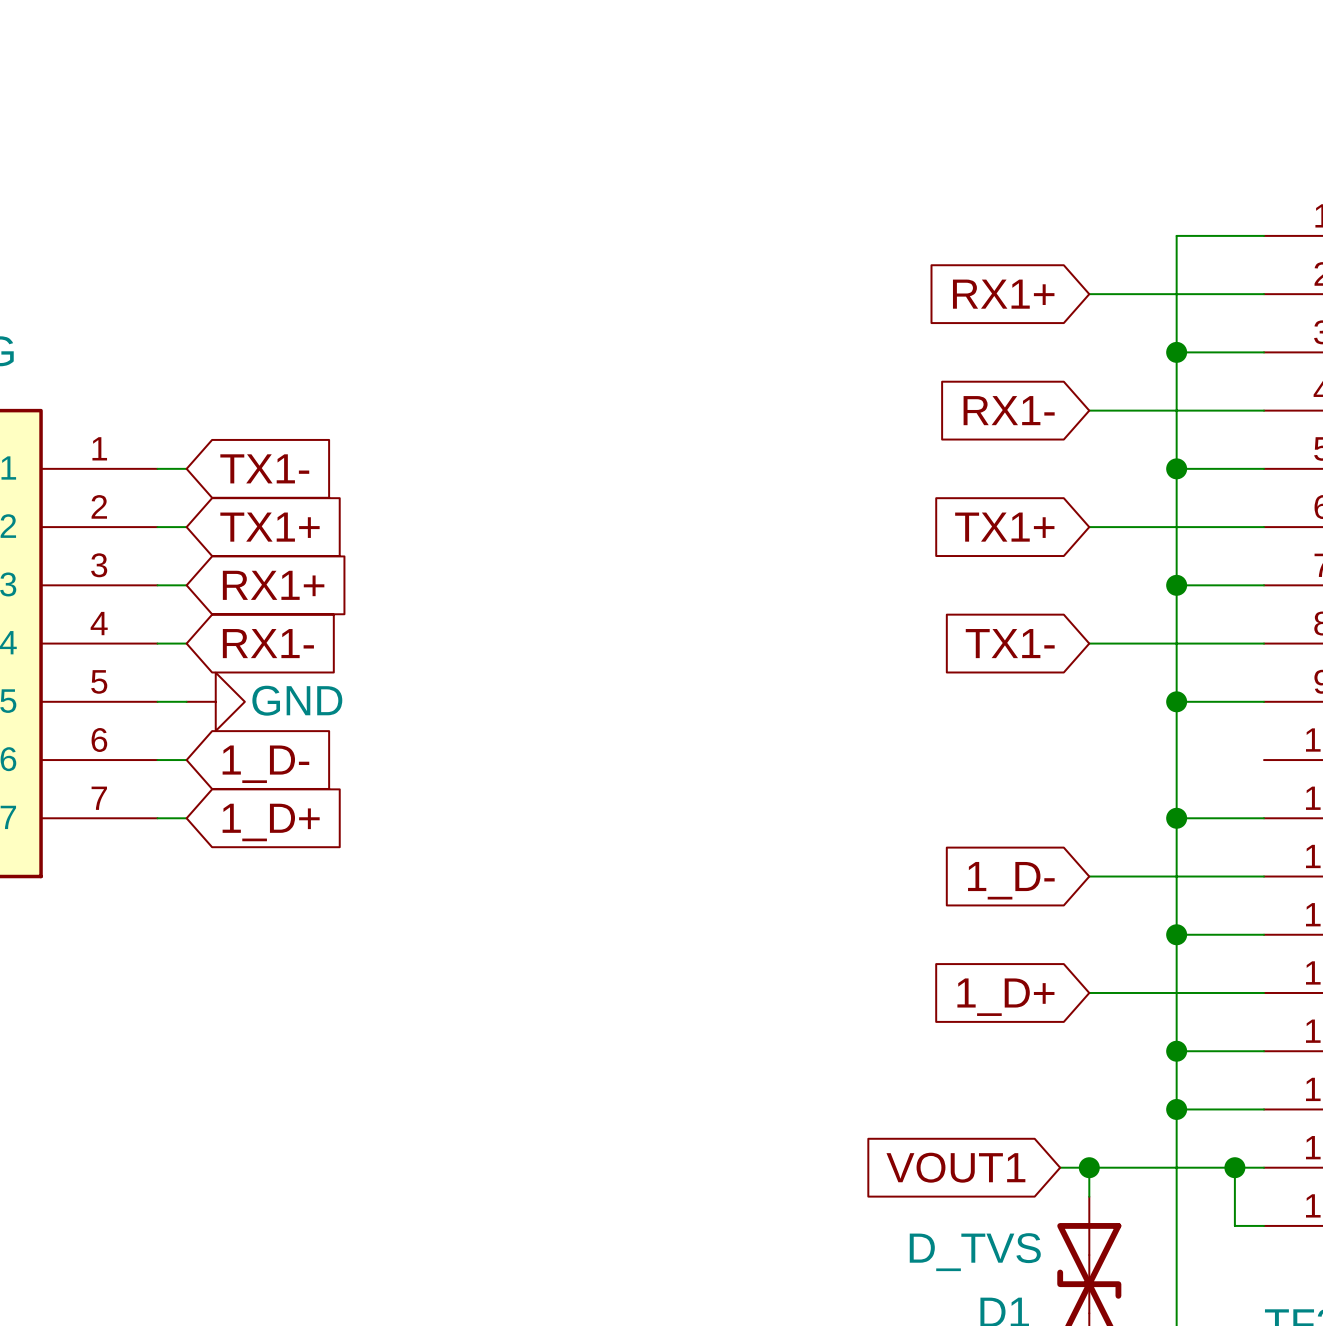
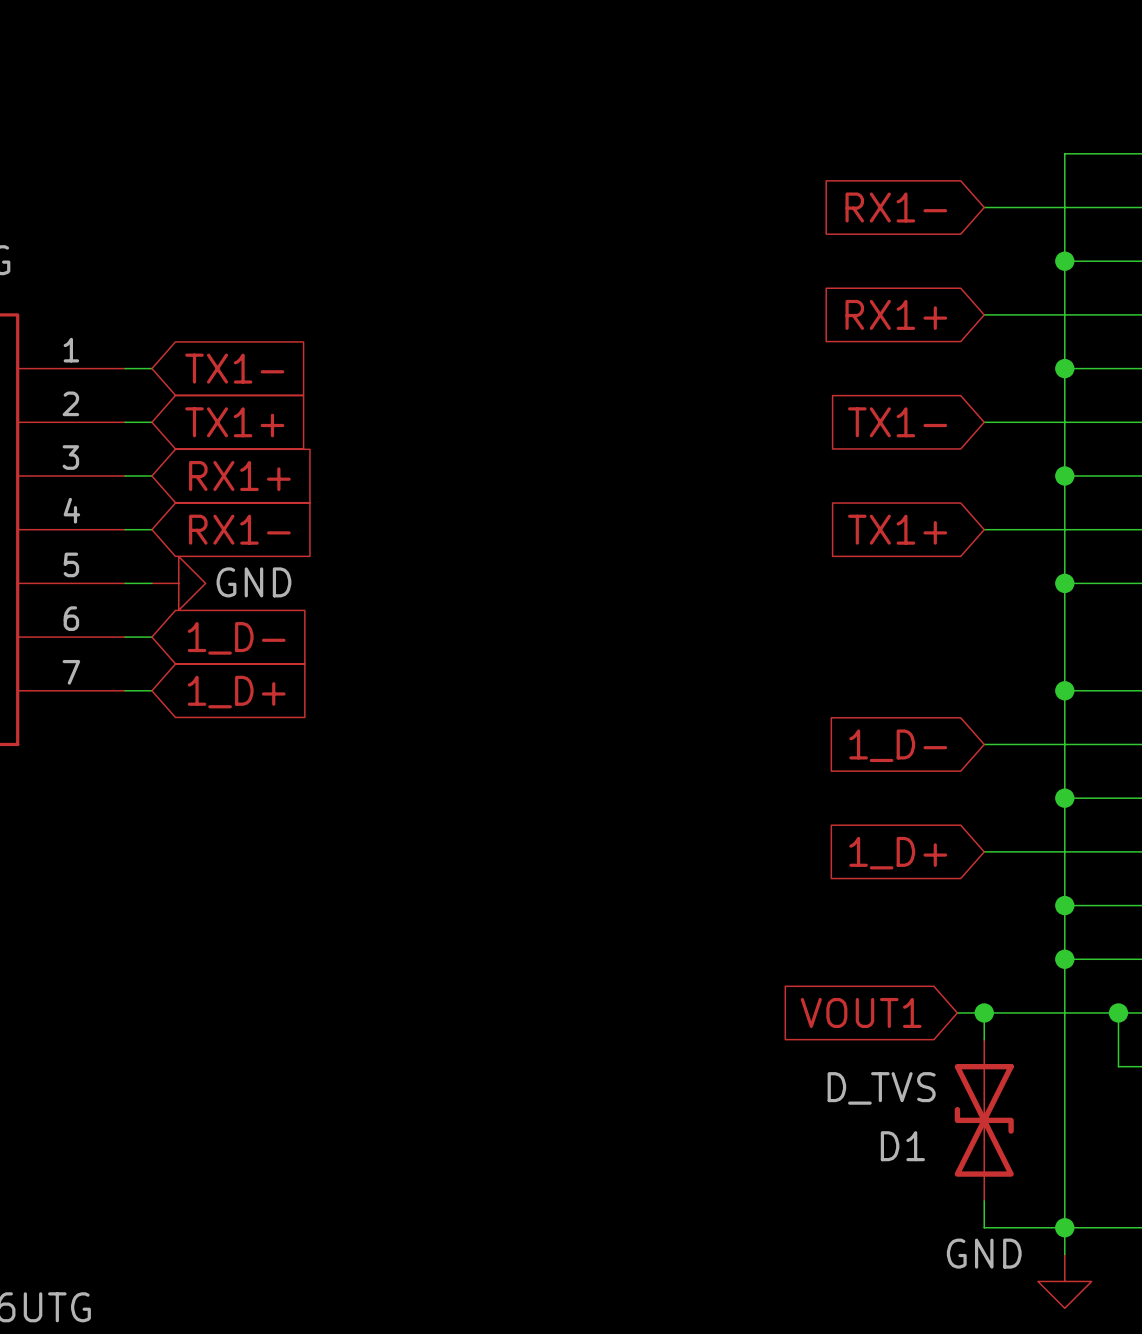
global label: RX1+ (1003, 294) -> RX1- (896, 207)
global label: RX1- (1009, 410) -> RX1+ (896, 314)
global label: TX1+ (1004, 527) -> TX1- (897, 422)
global label: TX1- (1010, 643) -> TX1+ (897, 529)

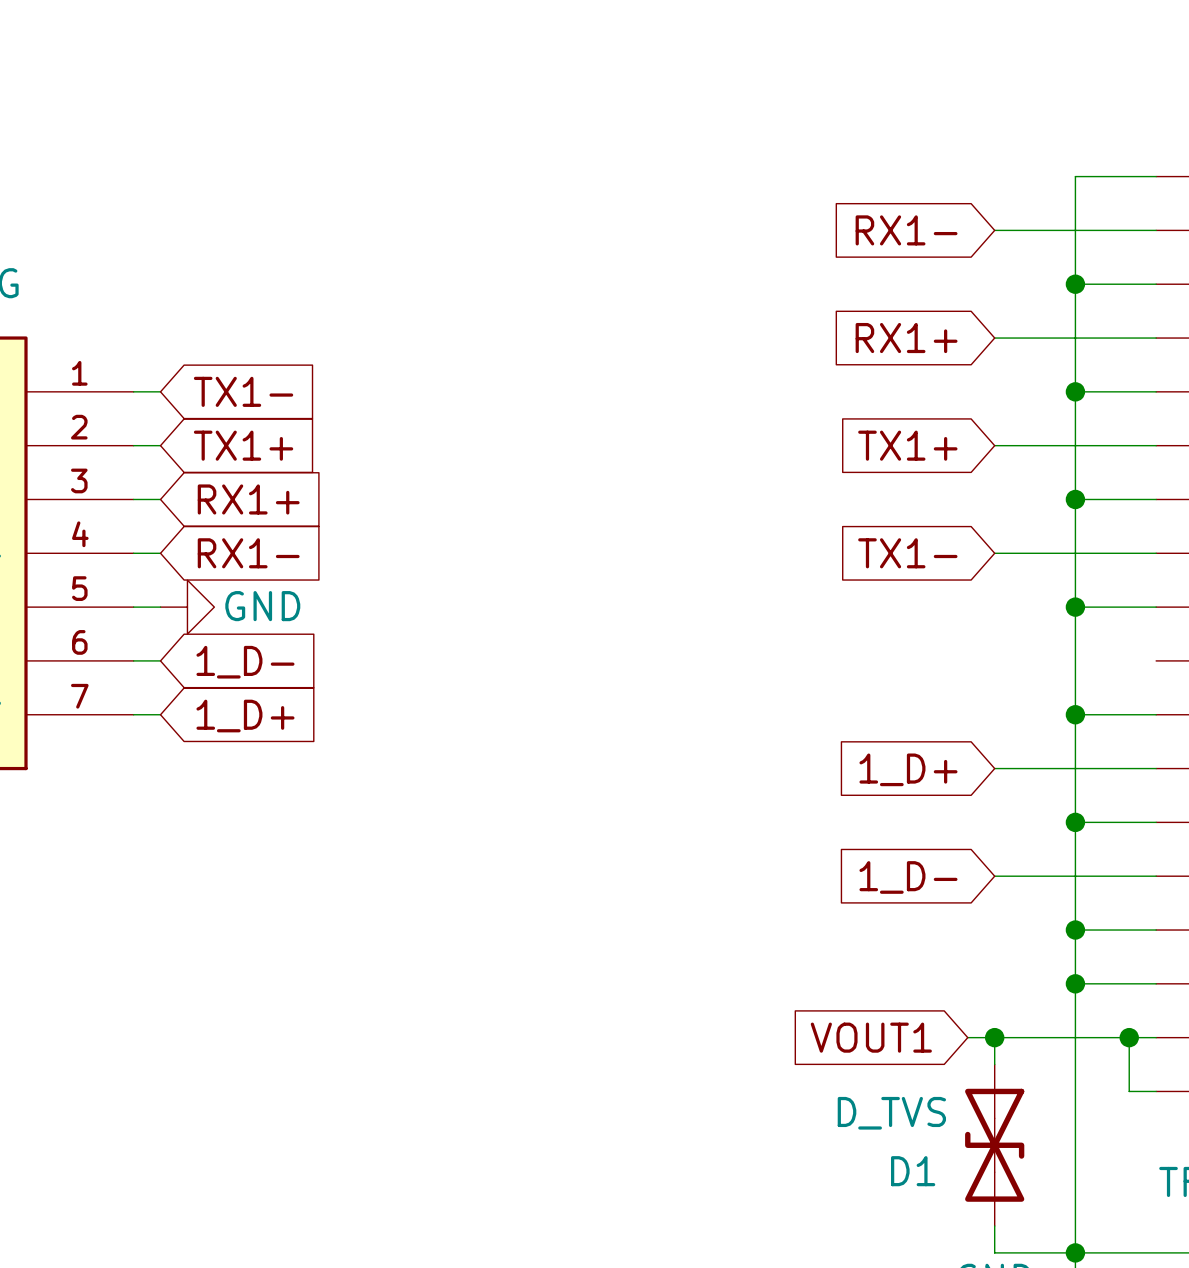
global label: TX1- (897, 422) -> TX1+ (907, 445)
global label: TX1+ (897, 529) -> TX1- (907, 553)
global label: 1_D- (898, 745) -> 1_D+ (908, 769)
global label: 1_D+ (898, 853) -> 1_D- (908, 877)

